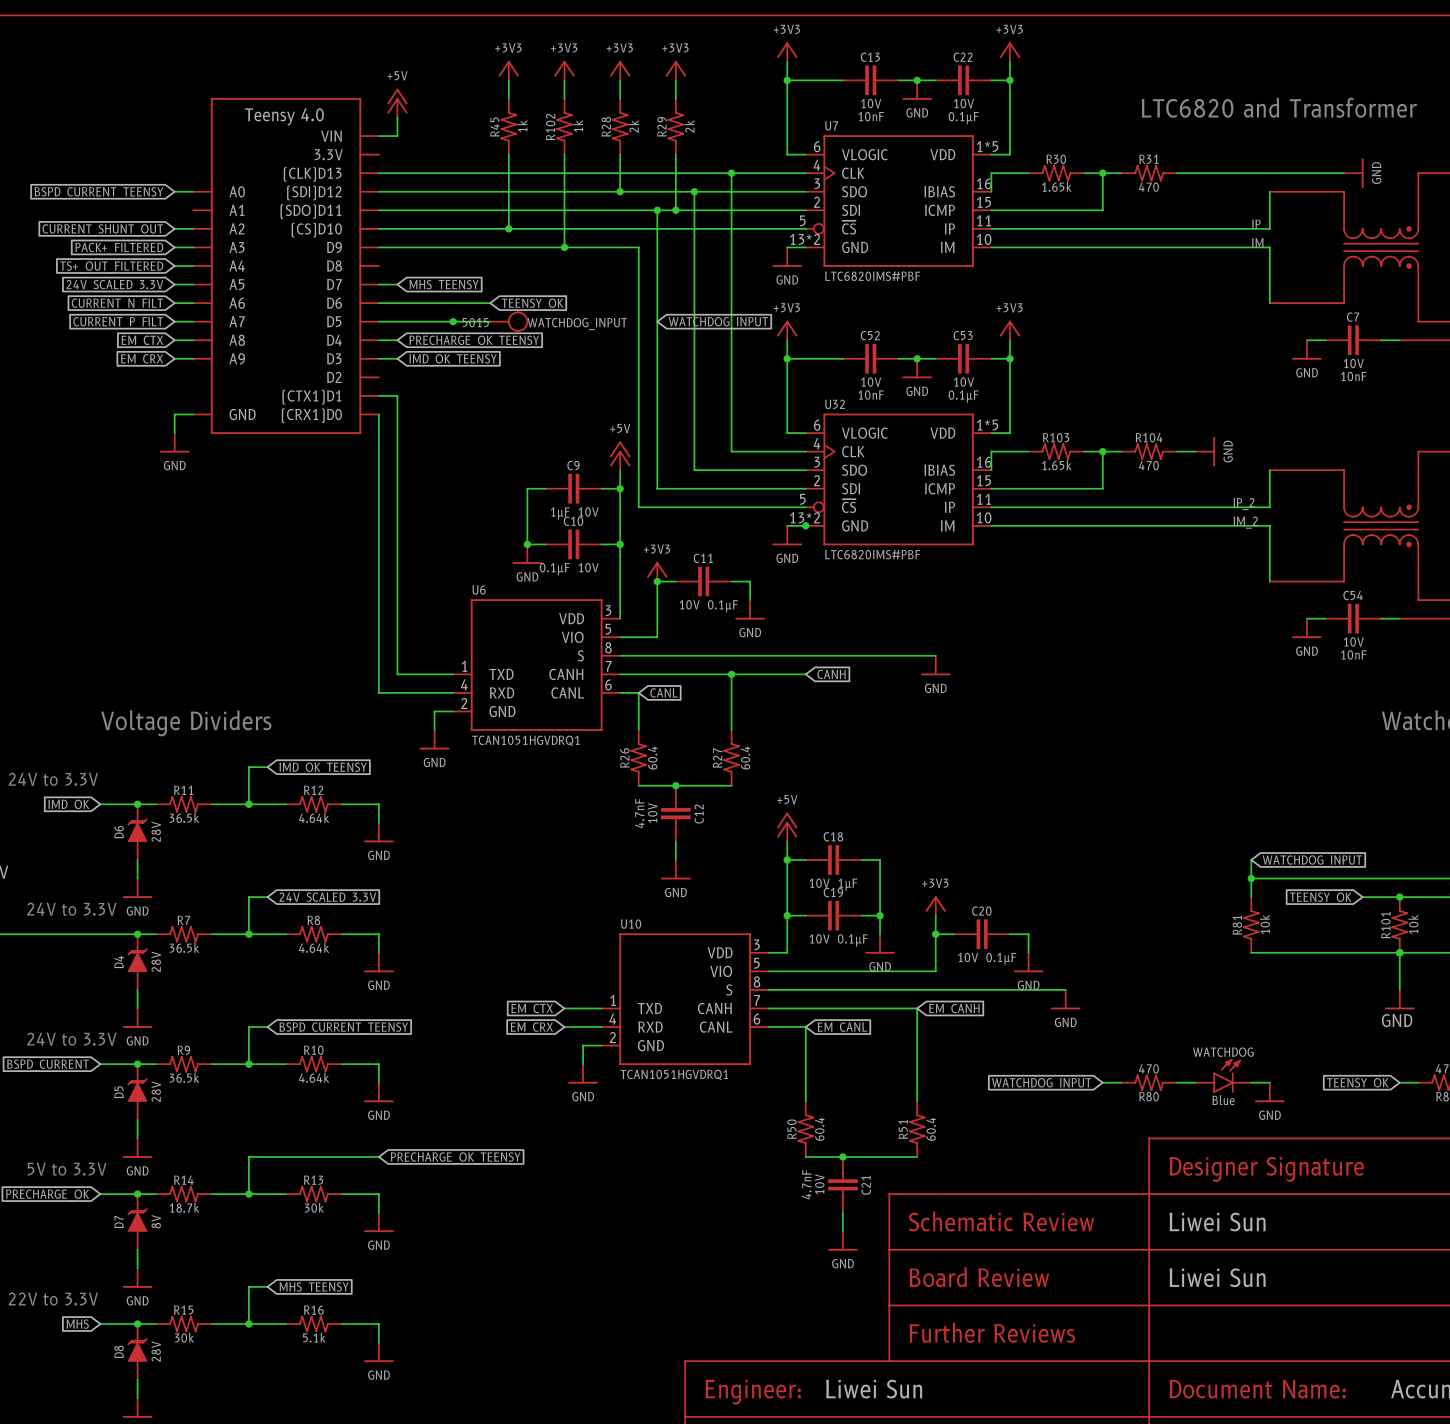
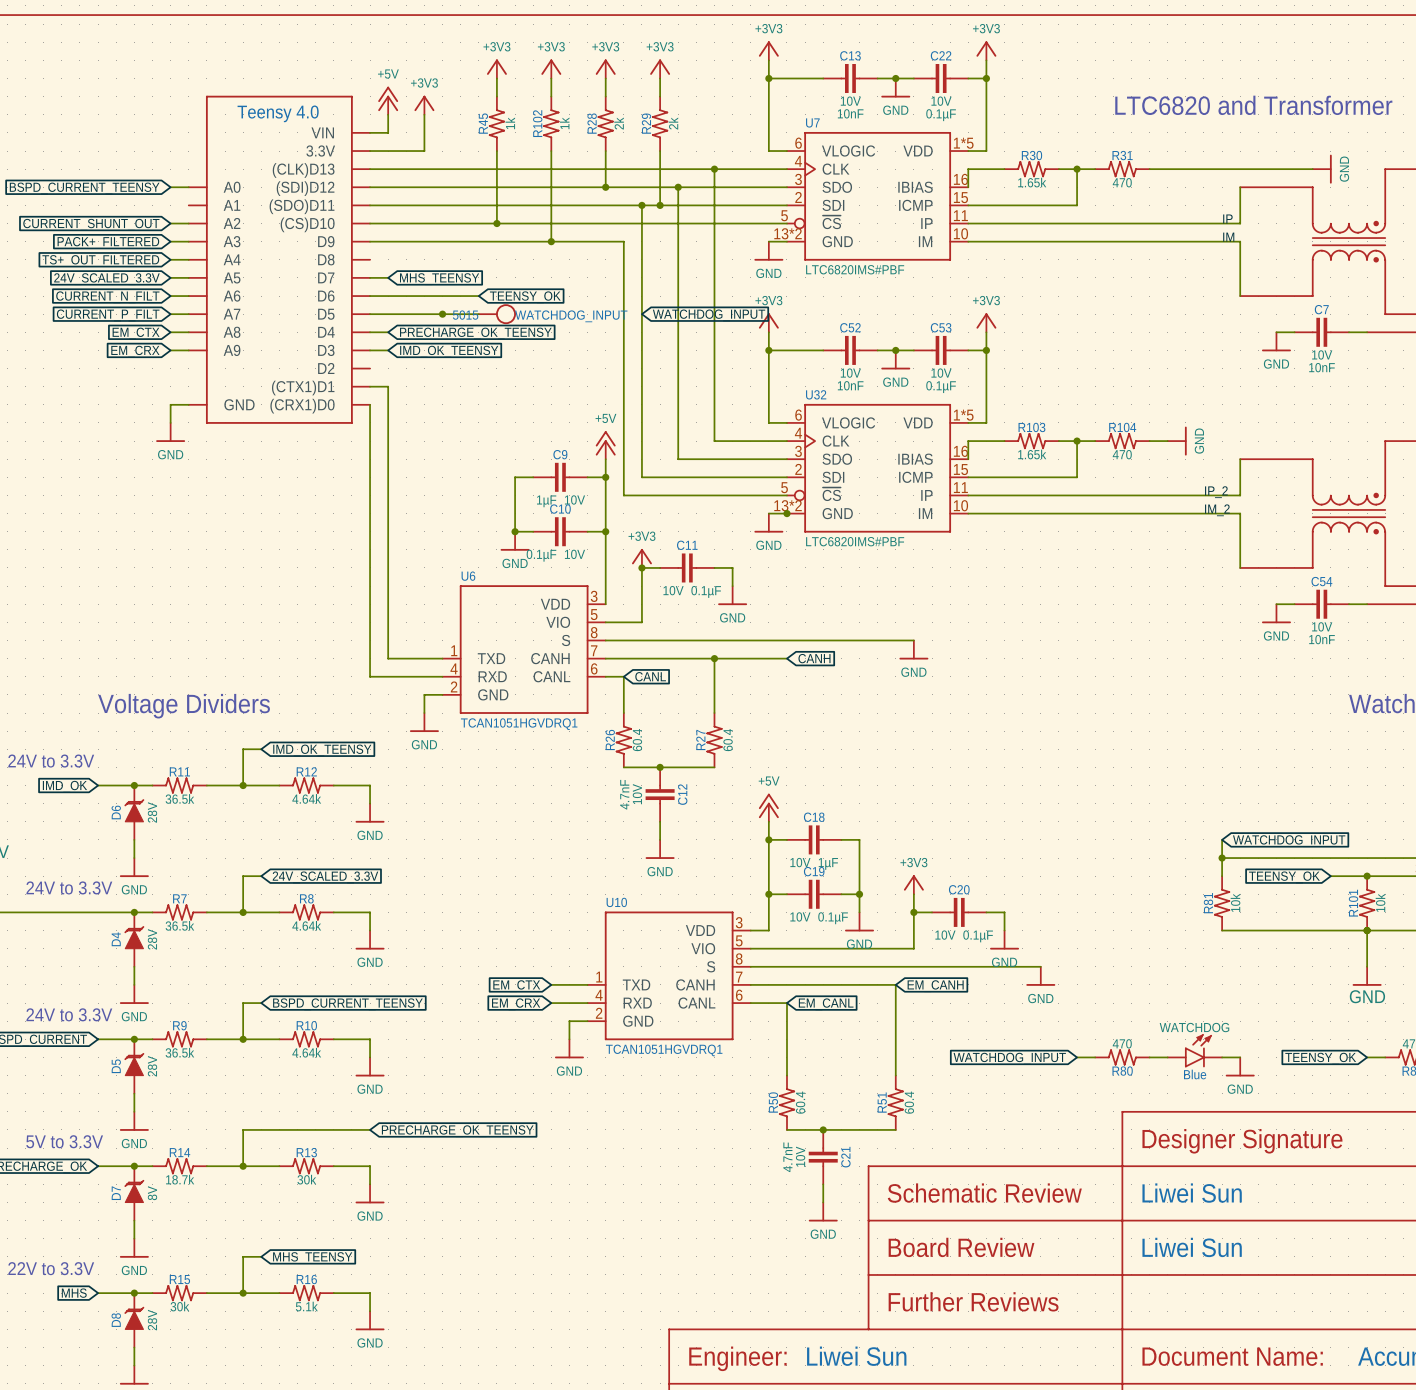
power symbol: none -> +3V3 (424, 105)
wire: none -> (424, 114) (424, 151) (370, 151)

